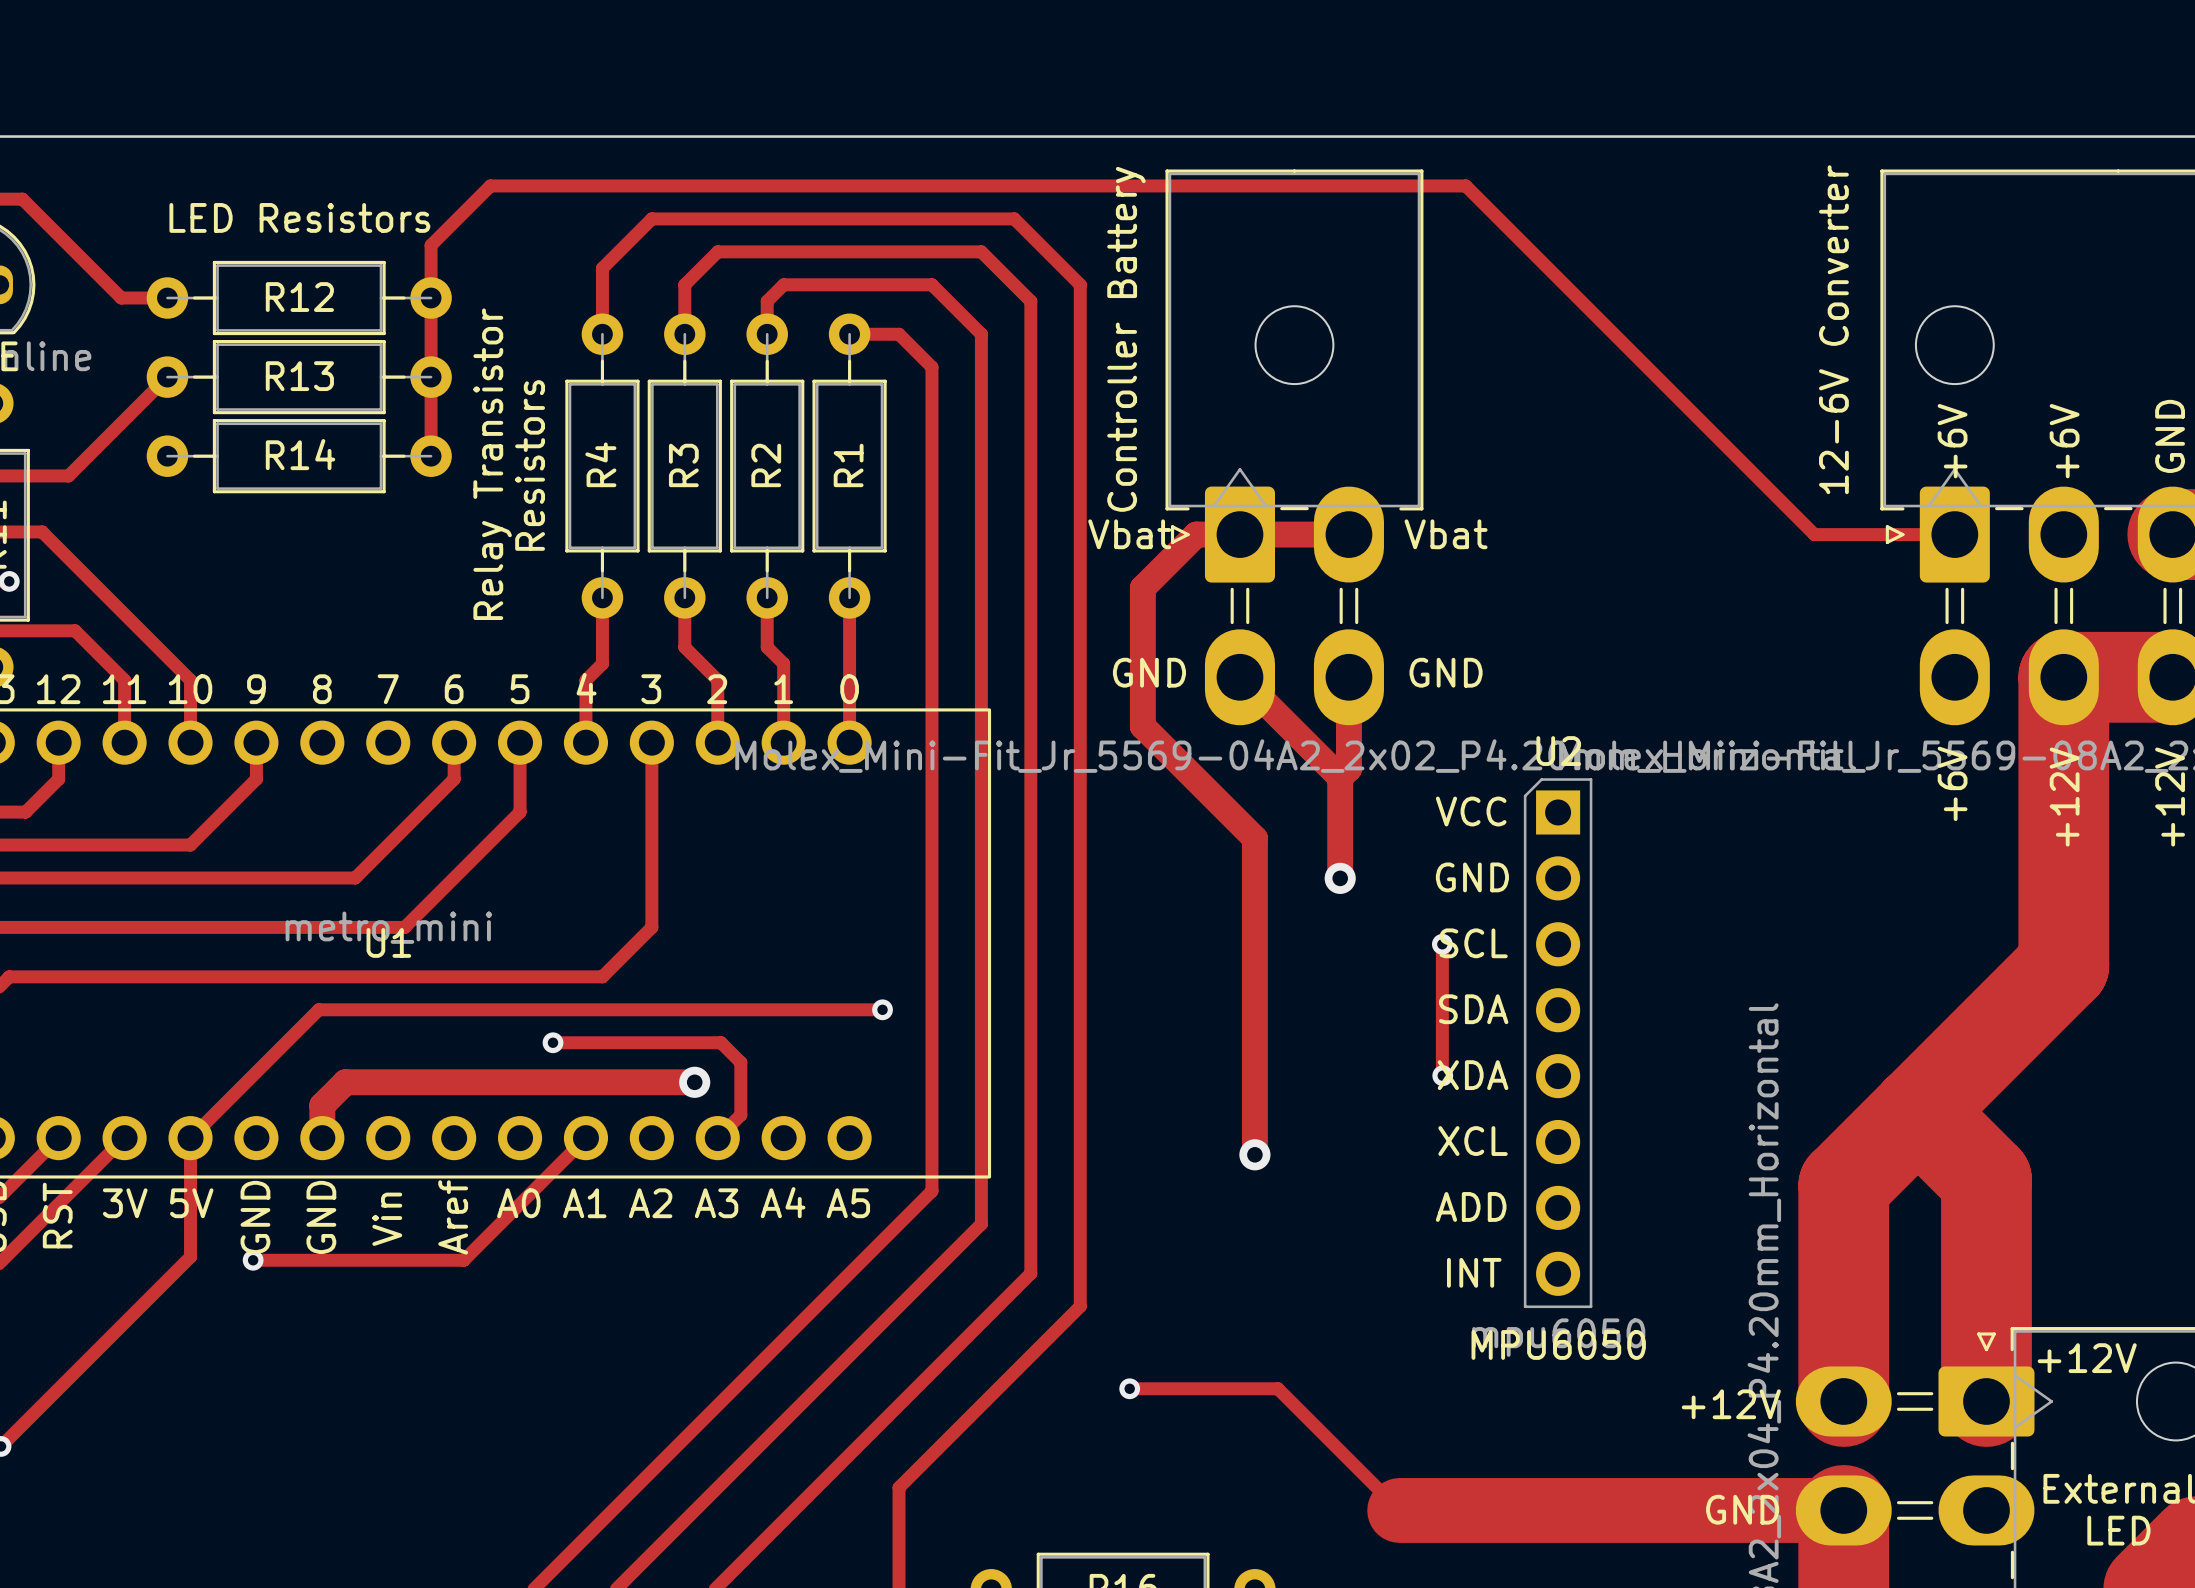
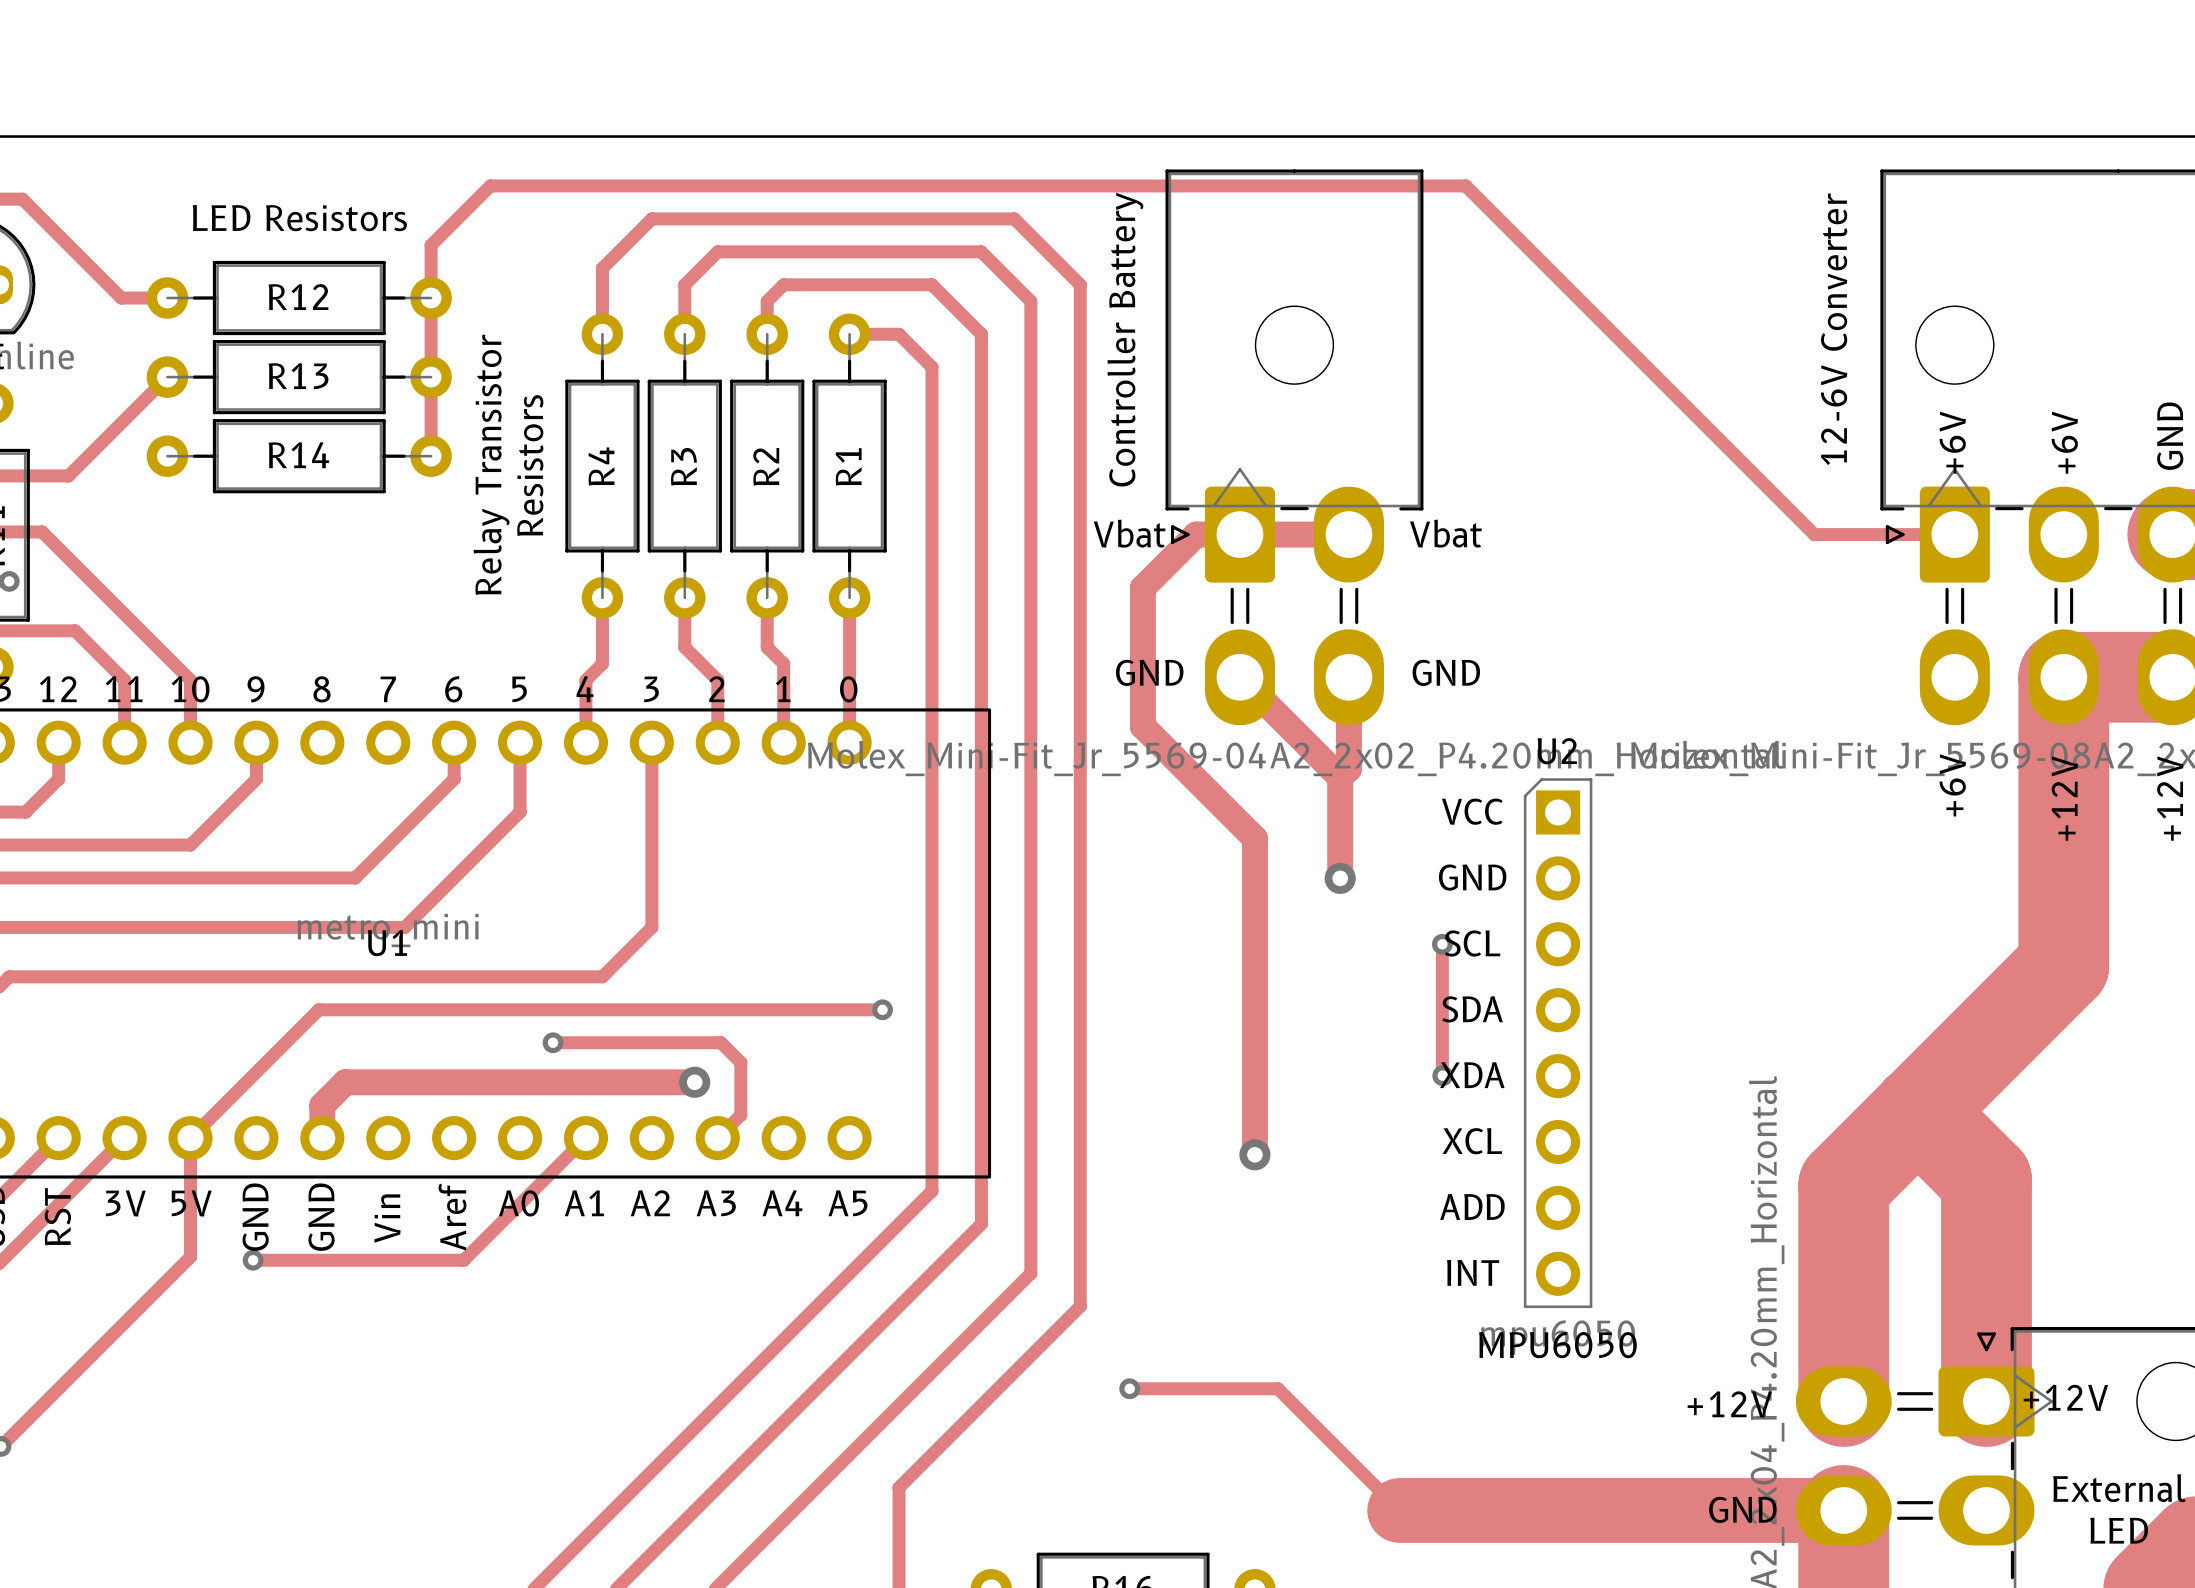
text position: +12V (2087, 1358) -> +12V (2065, 1397)

